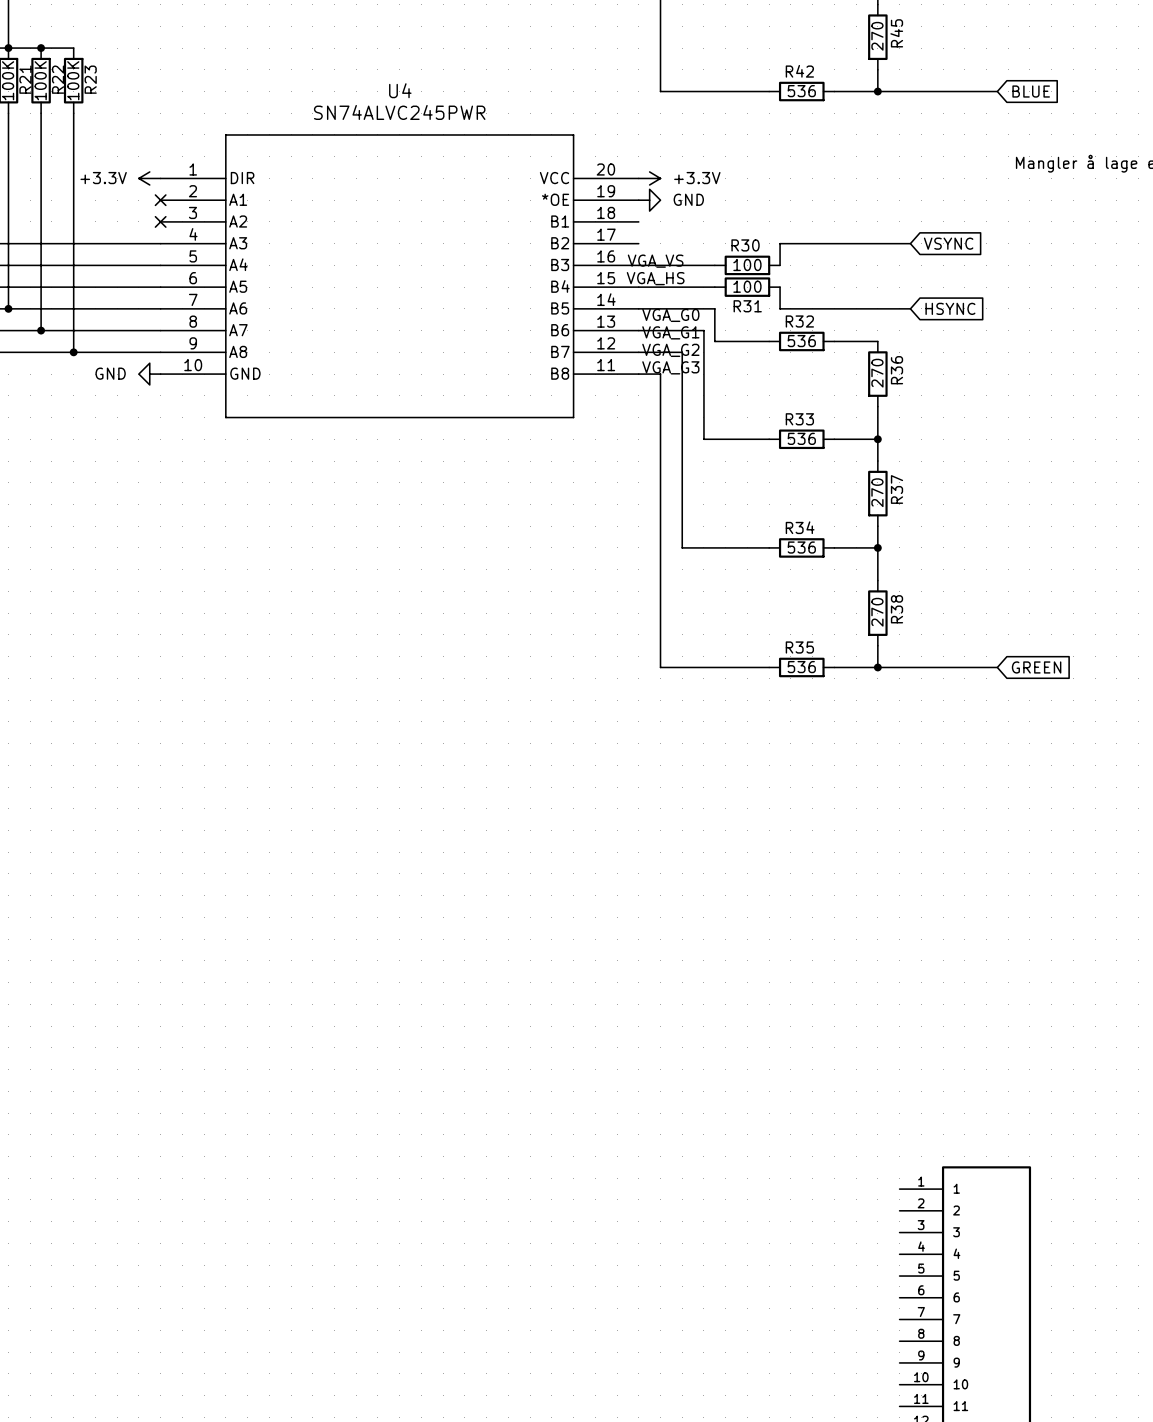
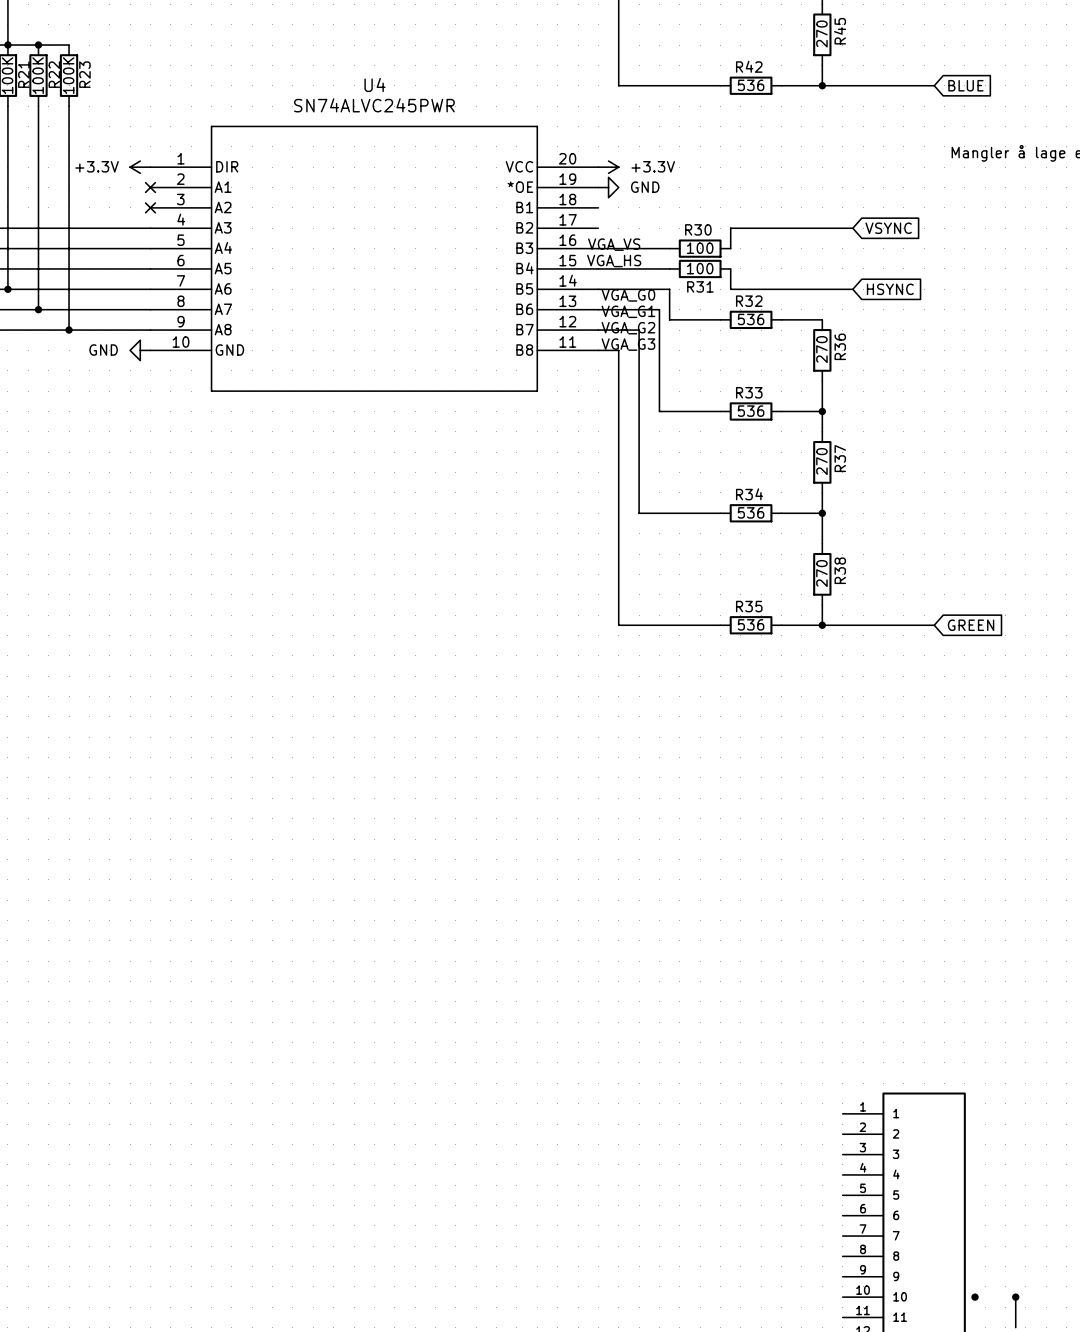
junction: none -> (975, 1297)
wire: none -> (1015, 1297) (1015, 1327)
junction: none -> (1015, 1297)

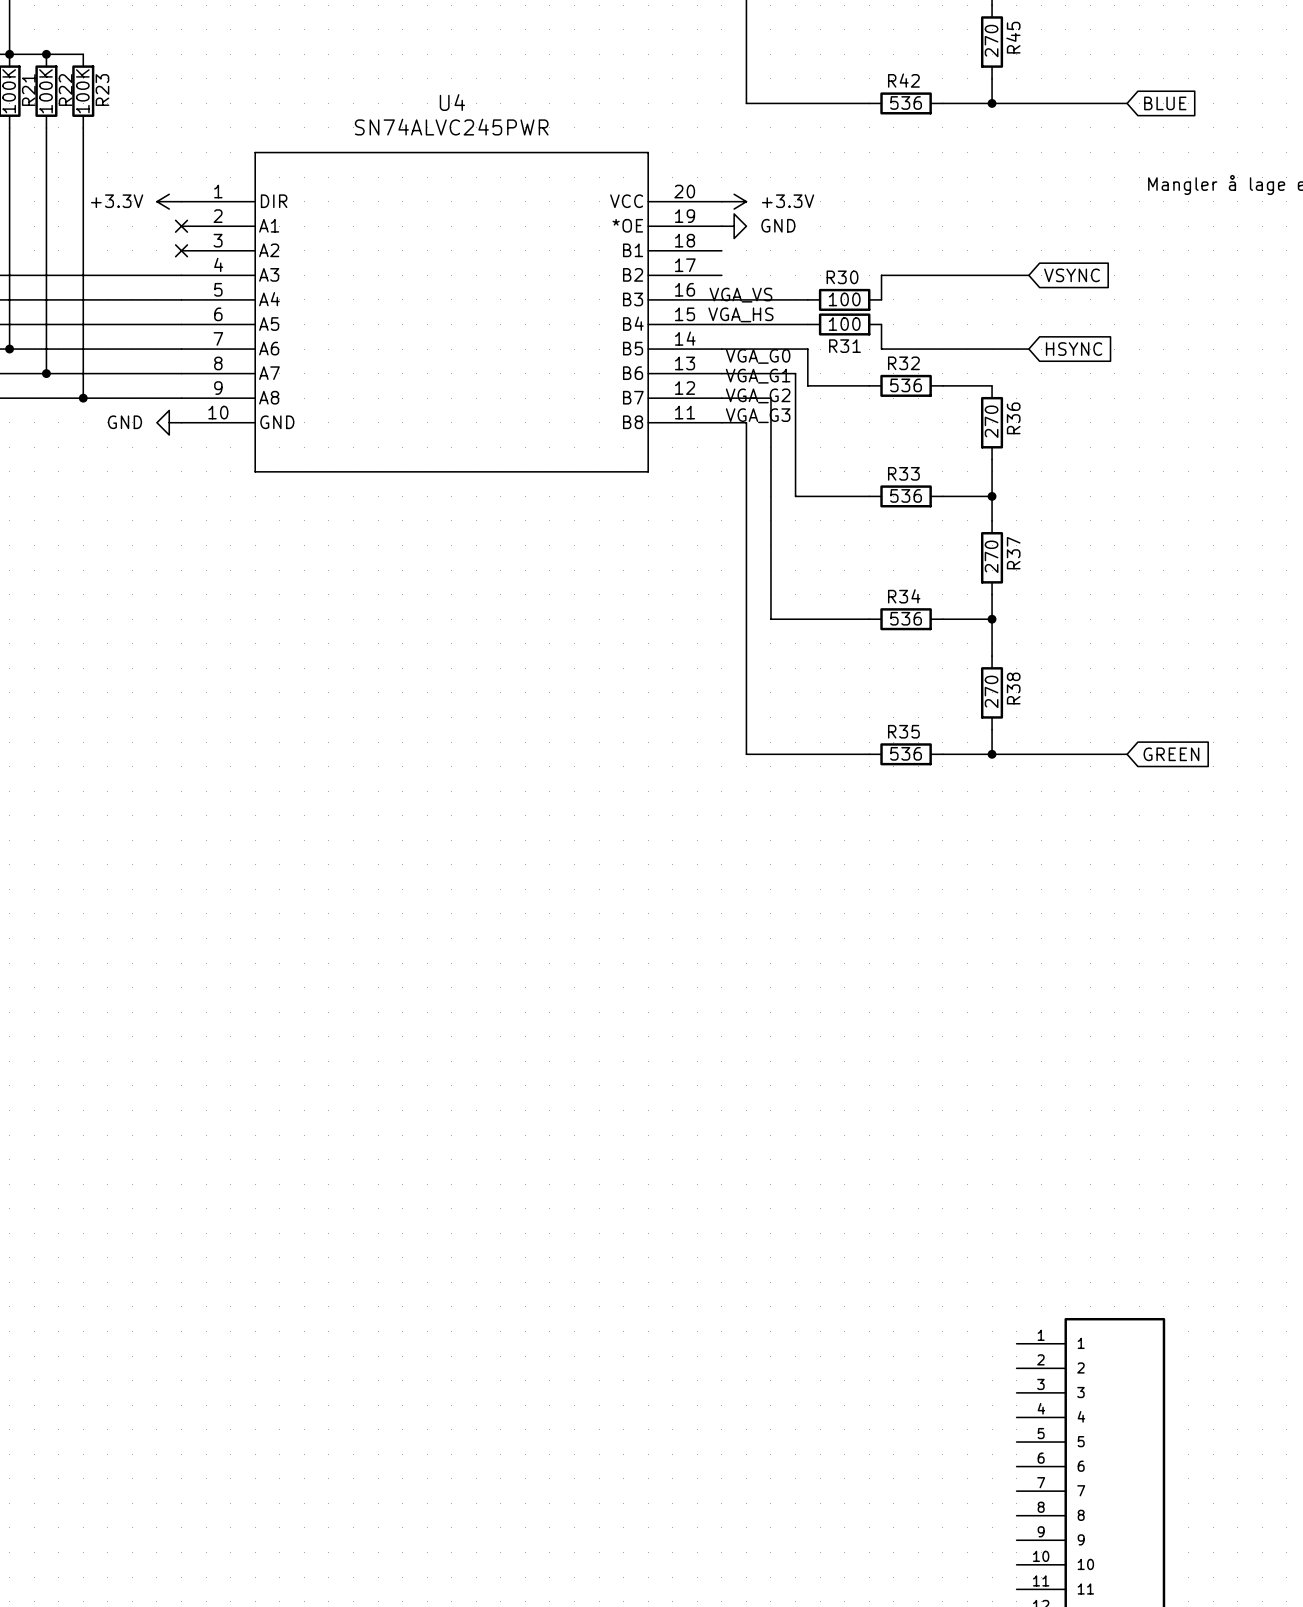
junction: (975, 1297) -> none
wire: (1015, 1297) (1015, 1327) -> none
junction: (1015, 1297) -> none

